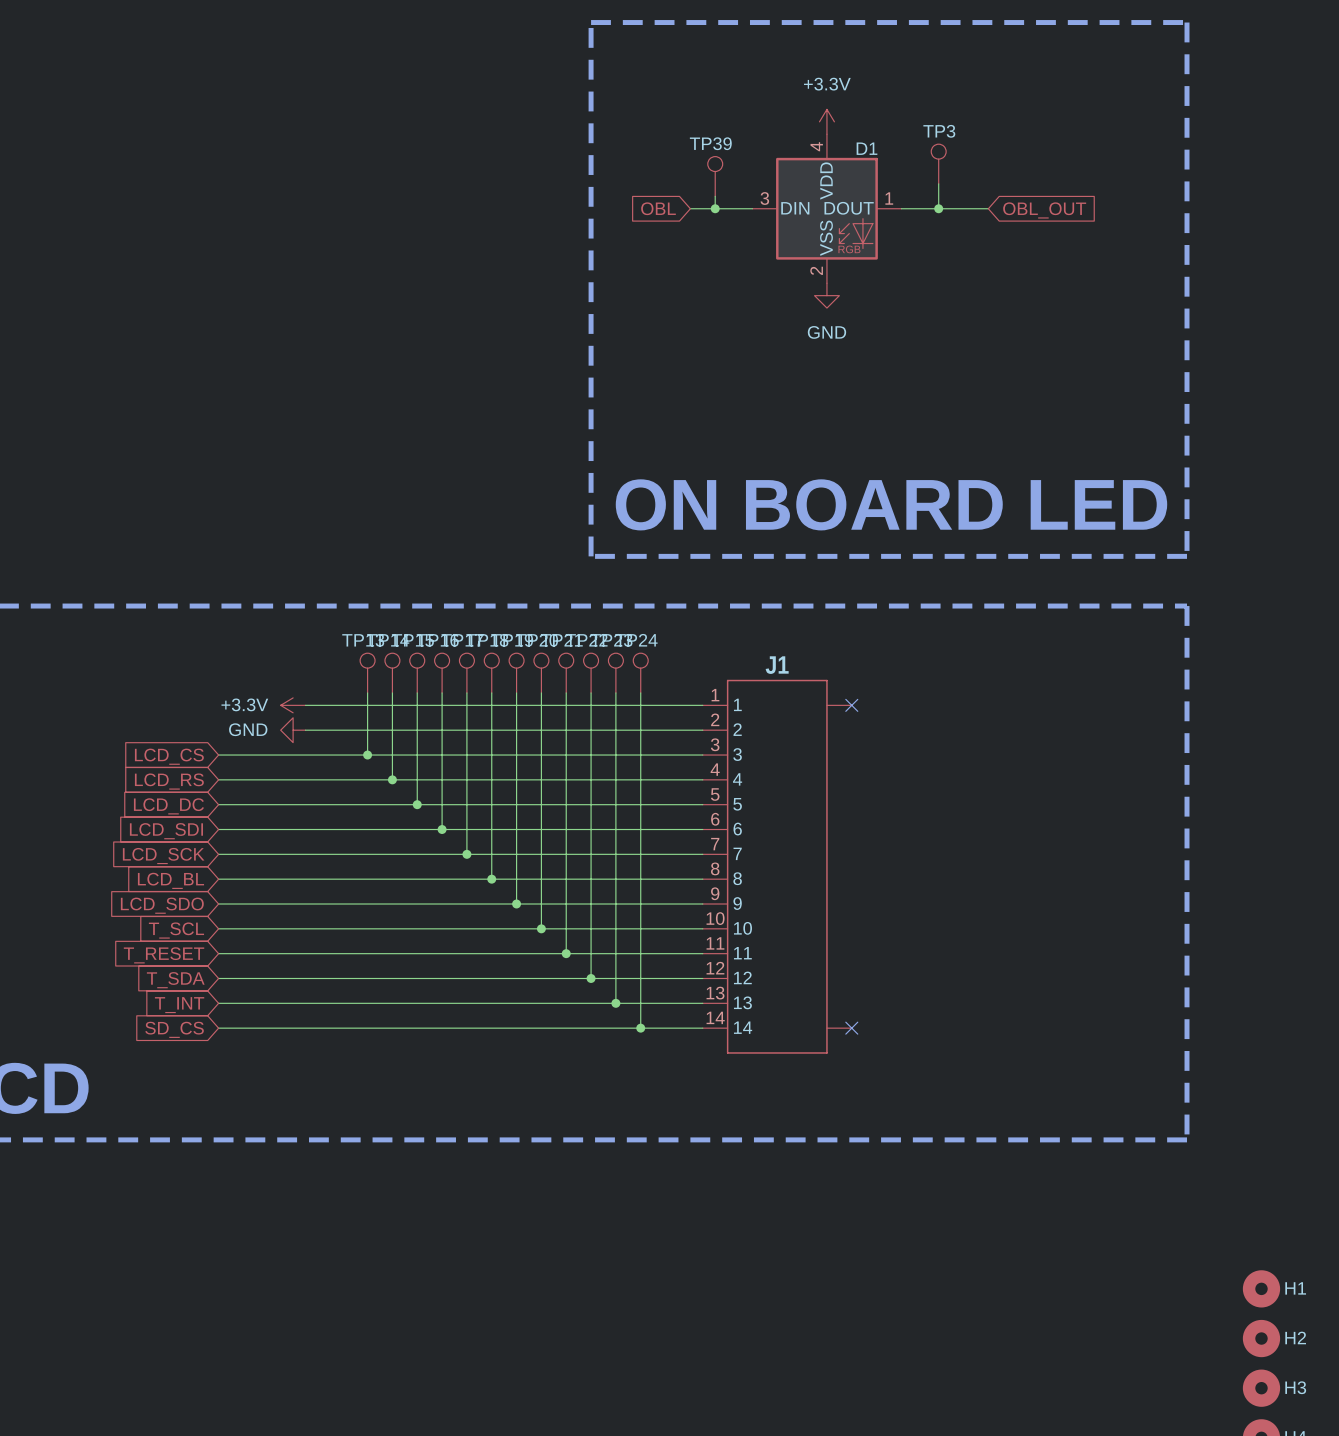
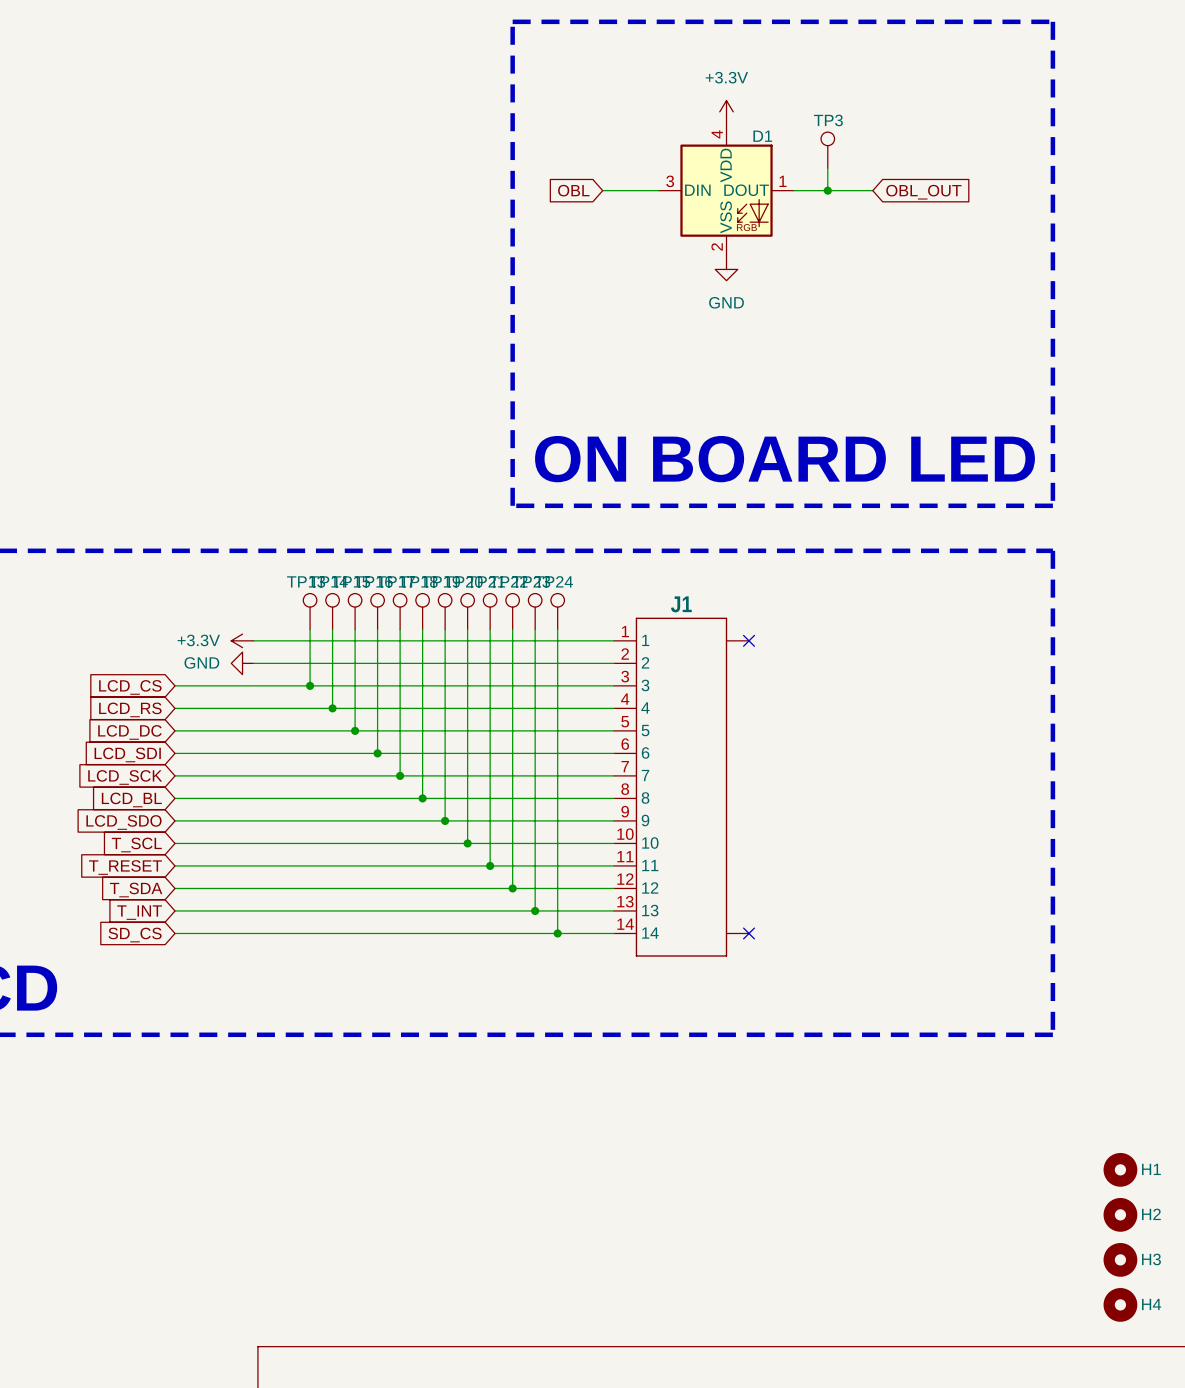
TP39: (715, 176) -> none
wire: (715, 196) (715, 208) -> none
junction: (715, 208) -> none

